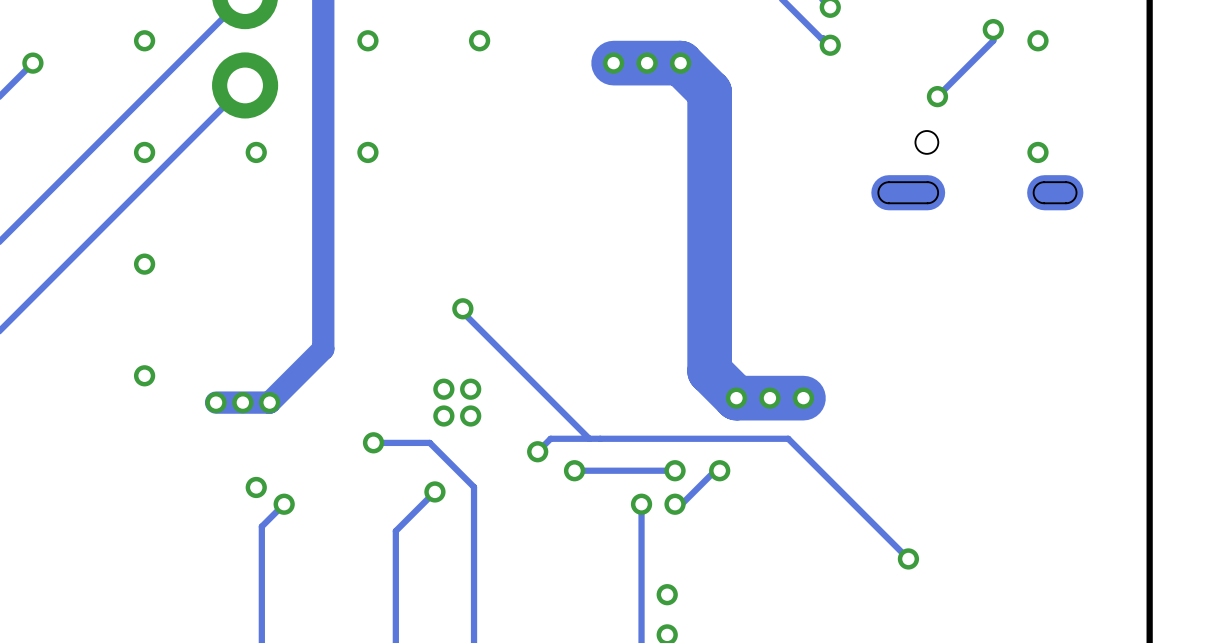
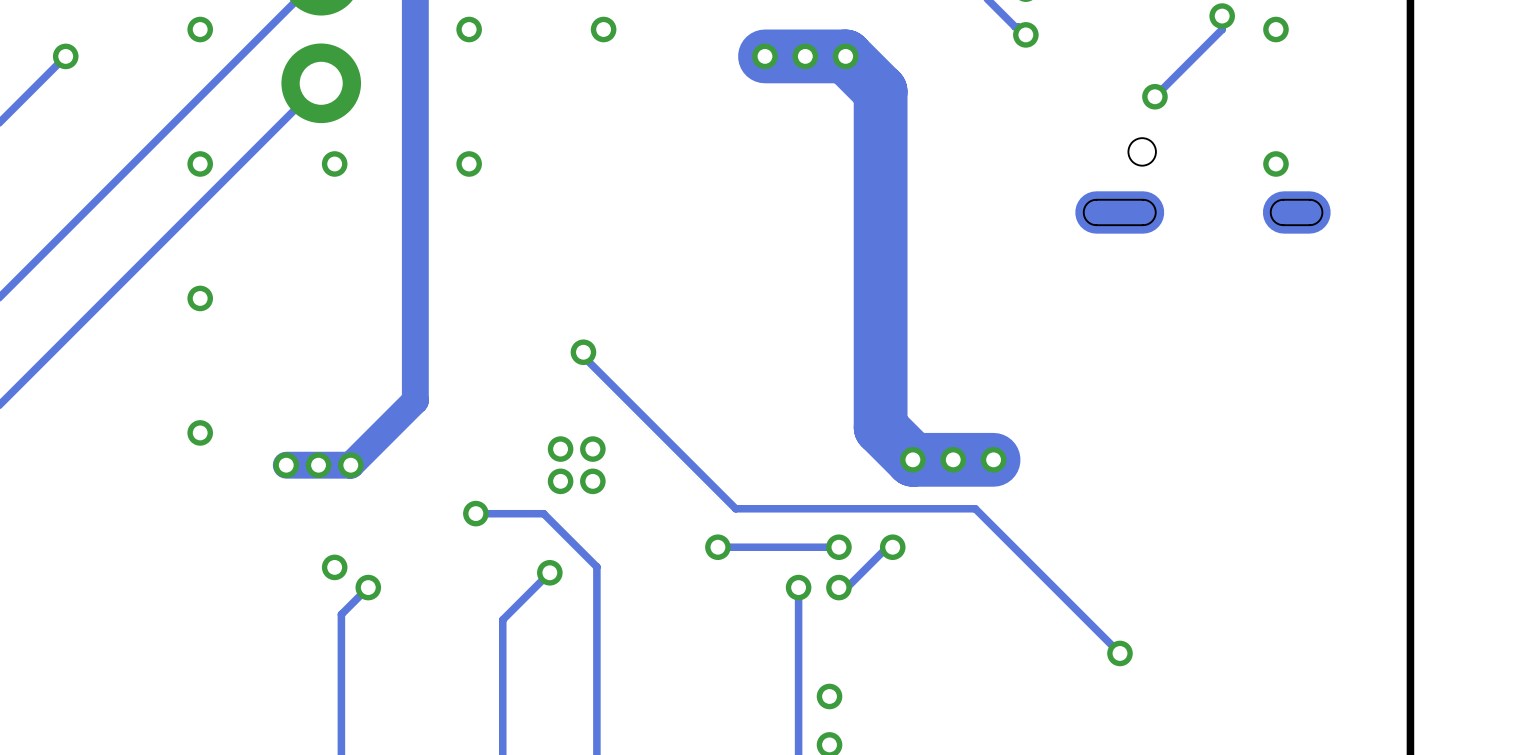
track: (589, 438) (550, 438) (537, 451) -> none
via: (537, 451) -> none

